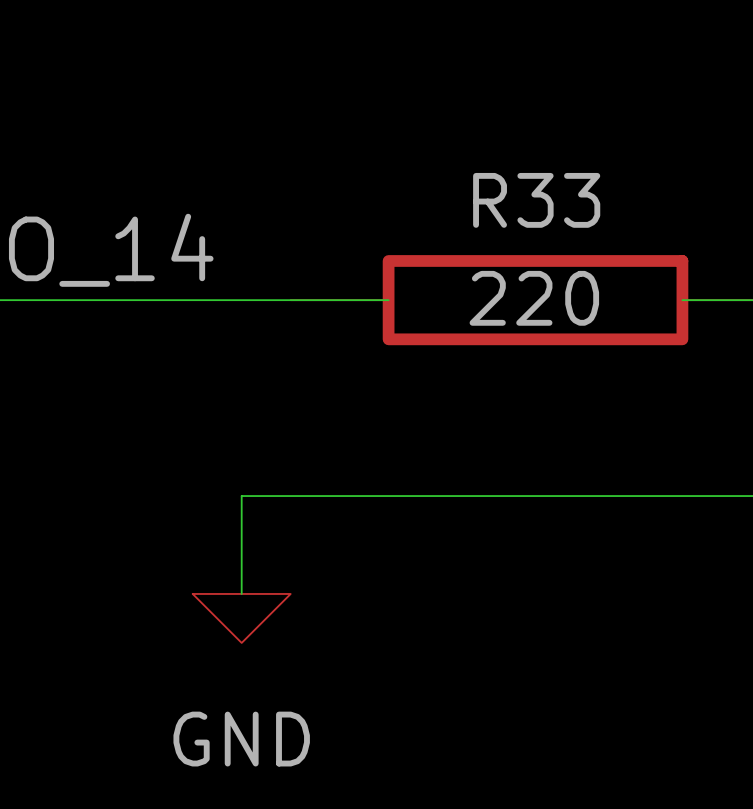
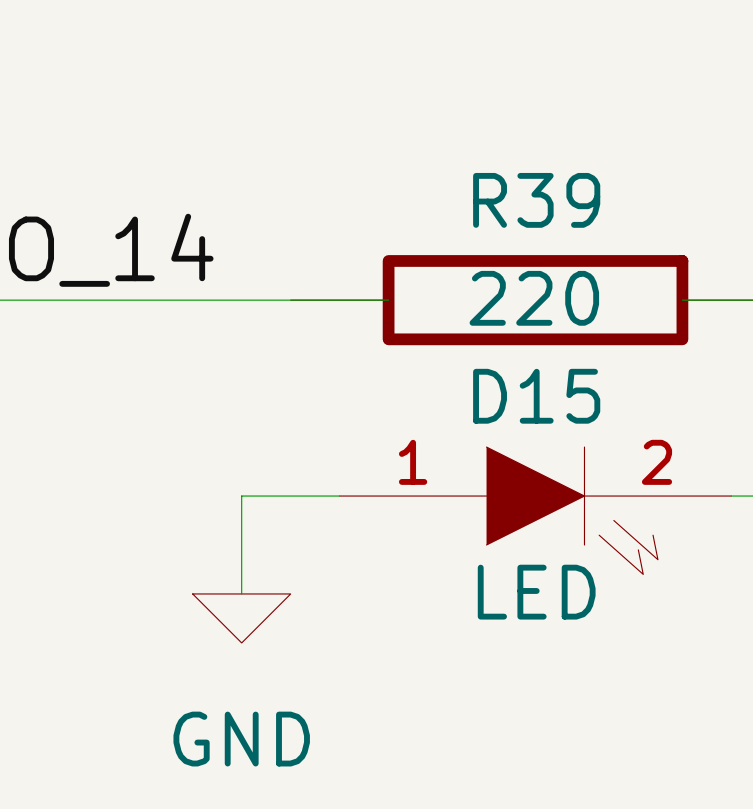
R33 name: R33 (536, 200) -> R39 (536, 200)
D15: none -> LED (535, 510)

